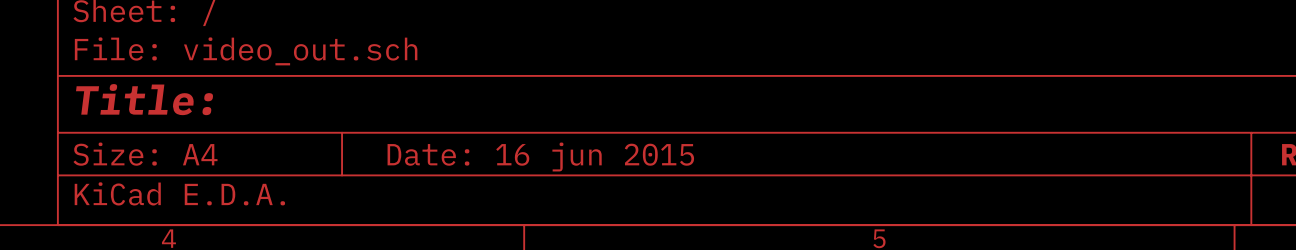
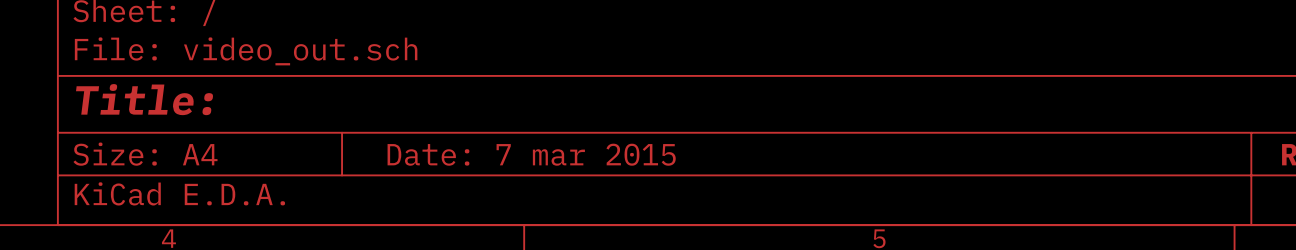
title block: Date: 16 jun 2015 (540, 156) -> Date: 7 mar 2015 (531, 154)

